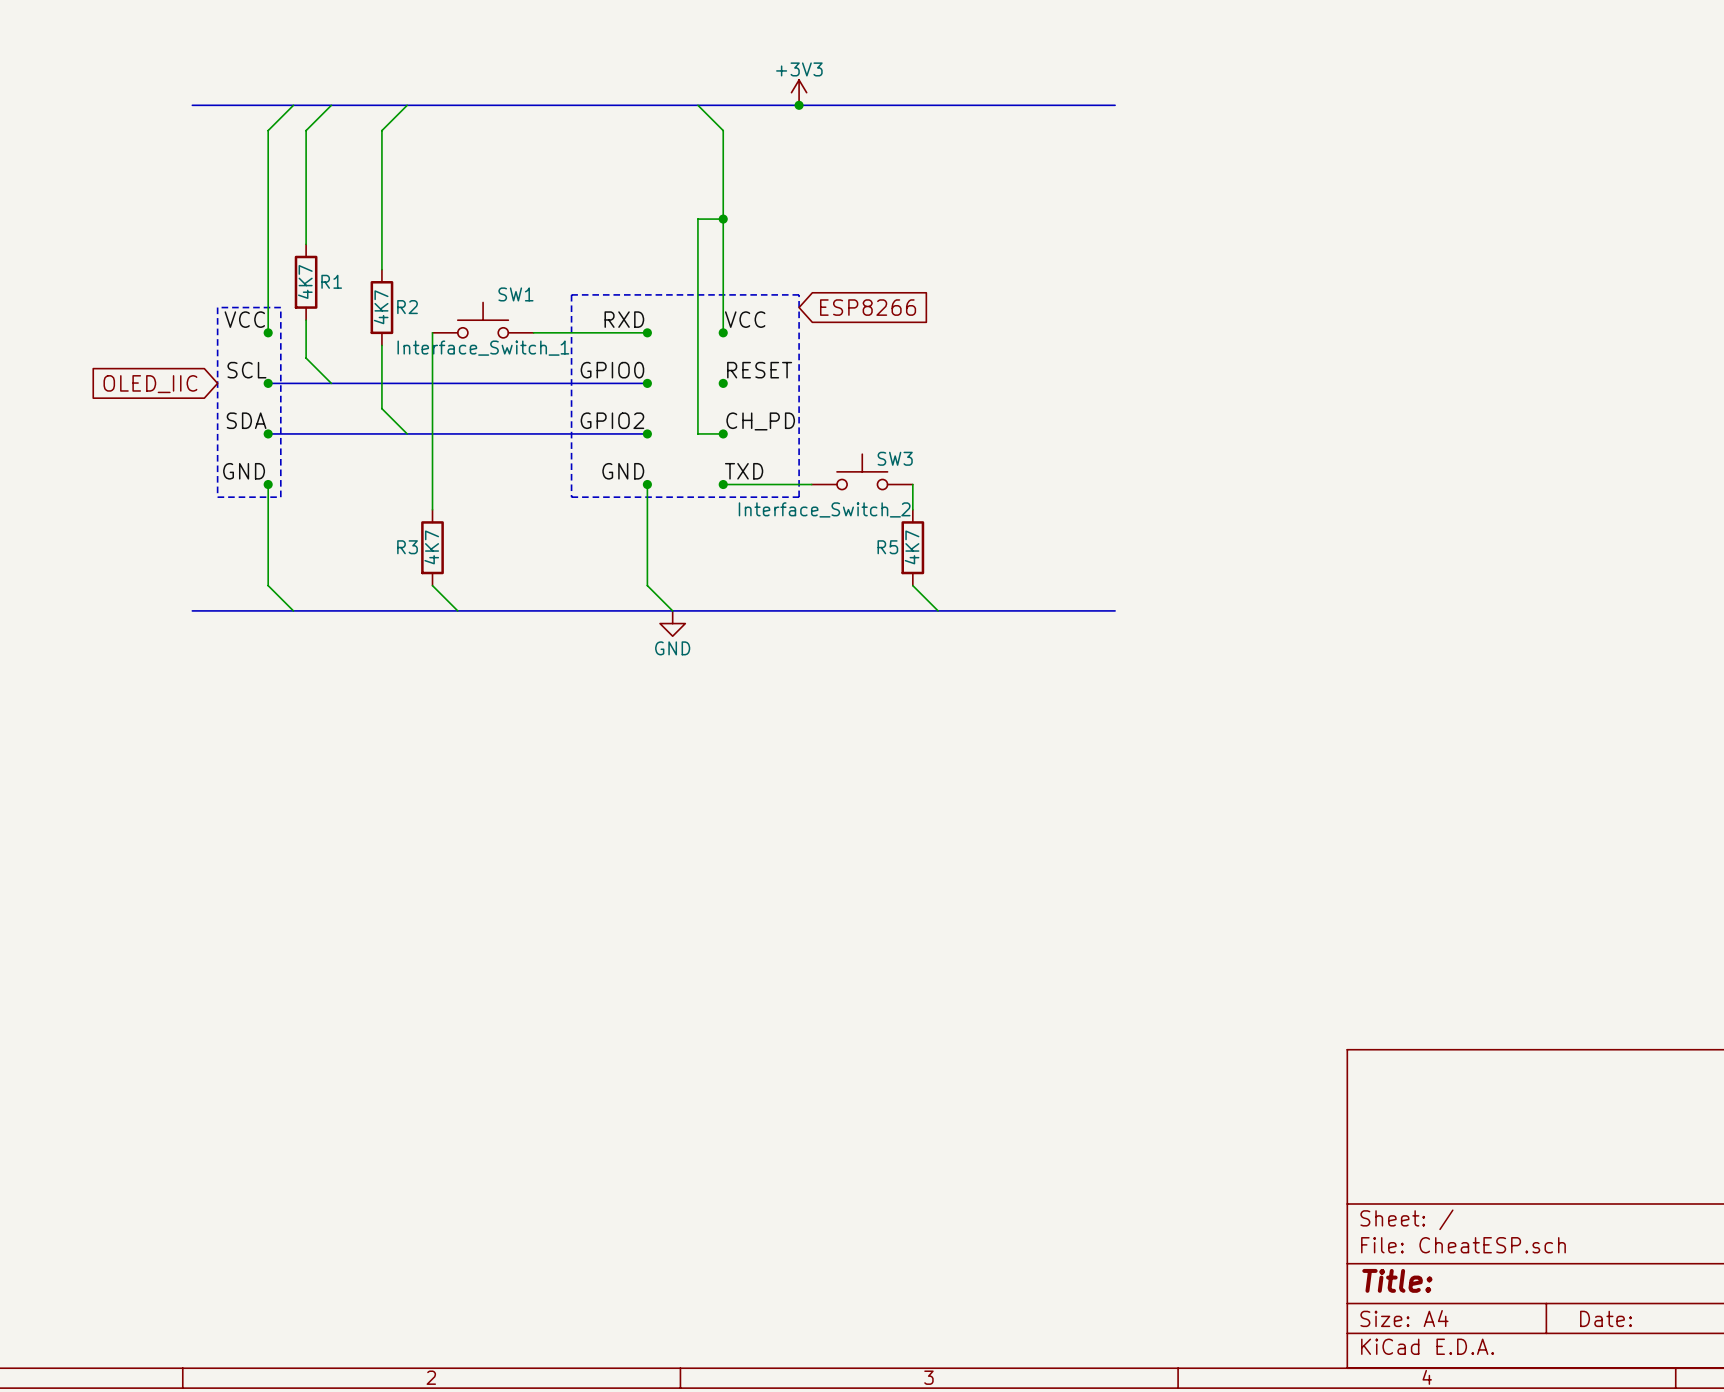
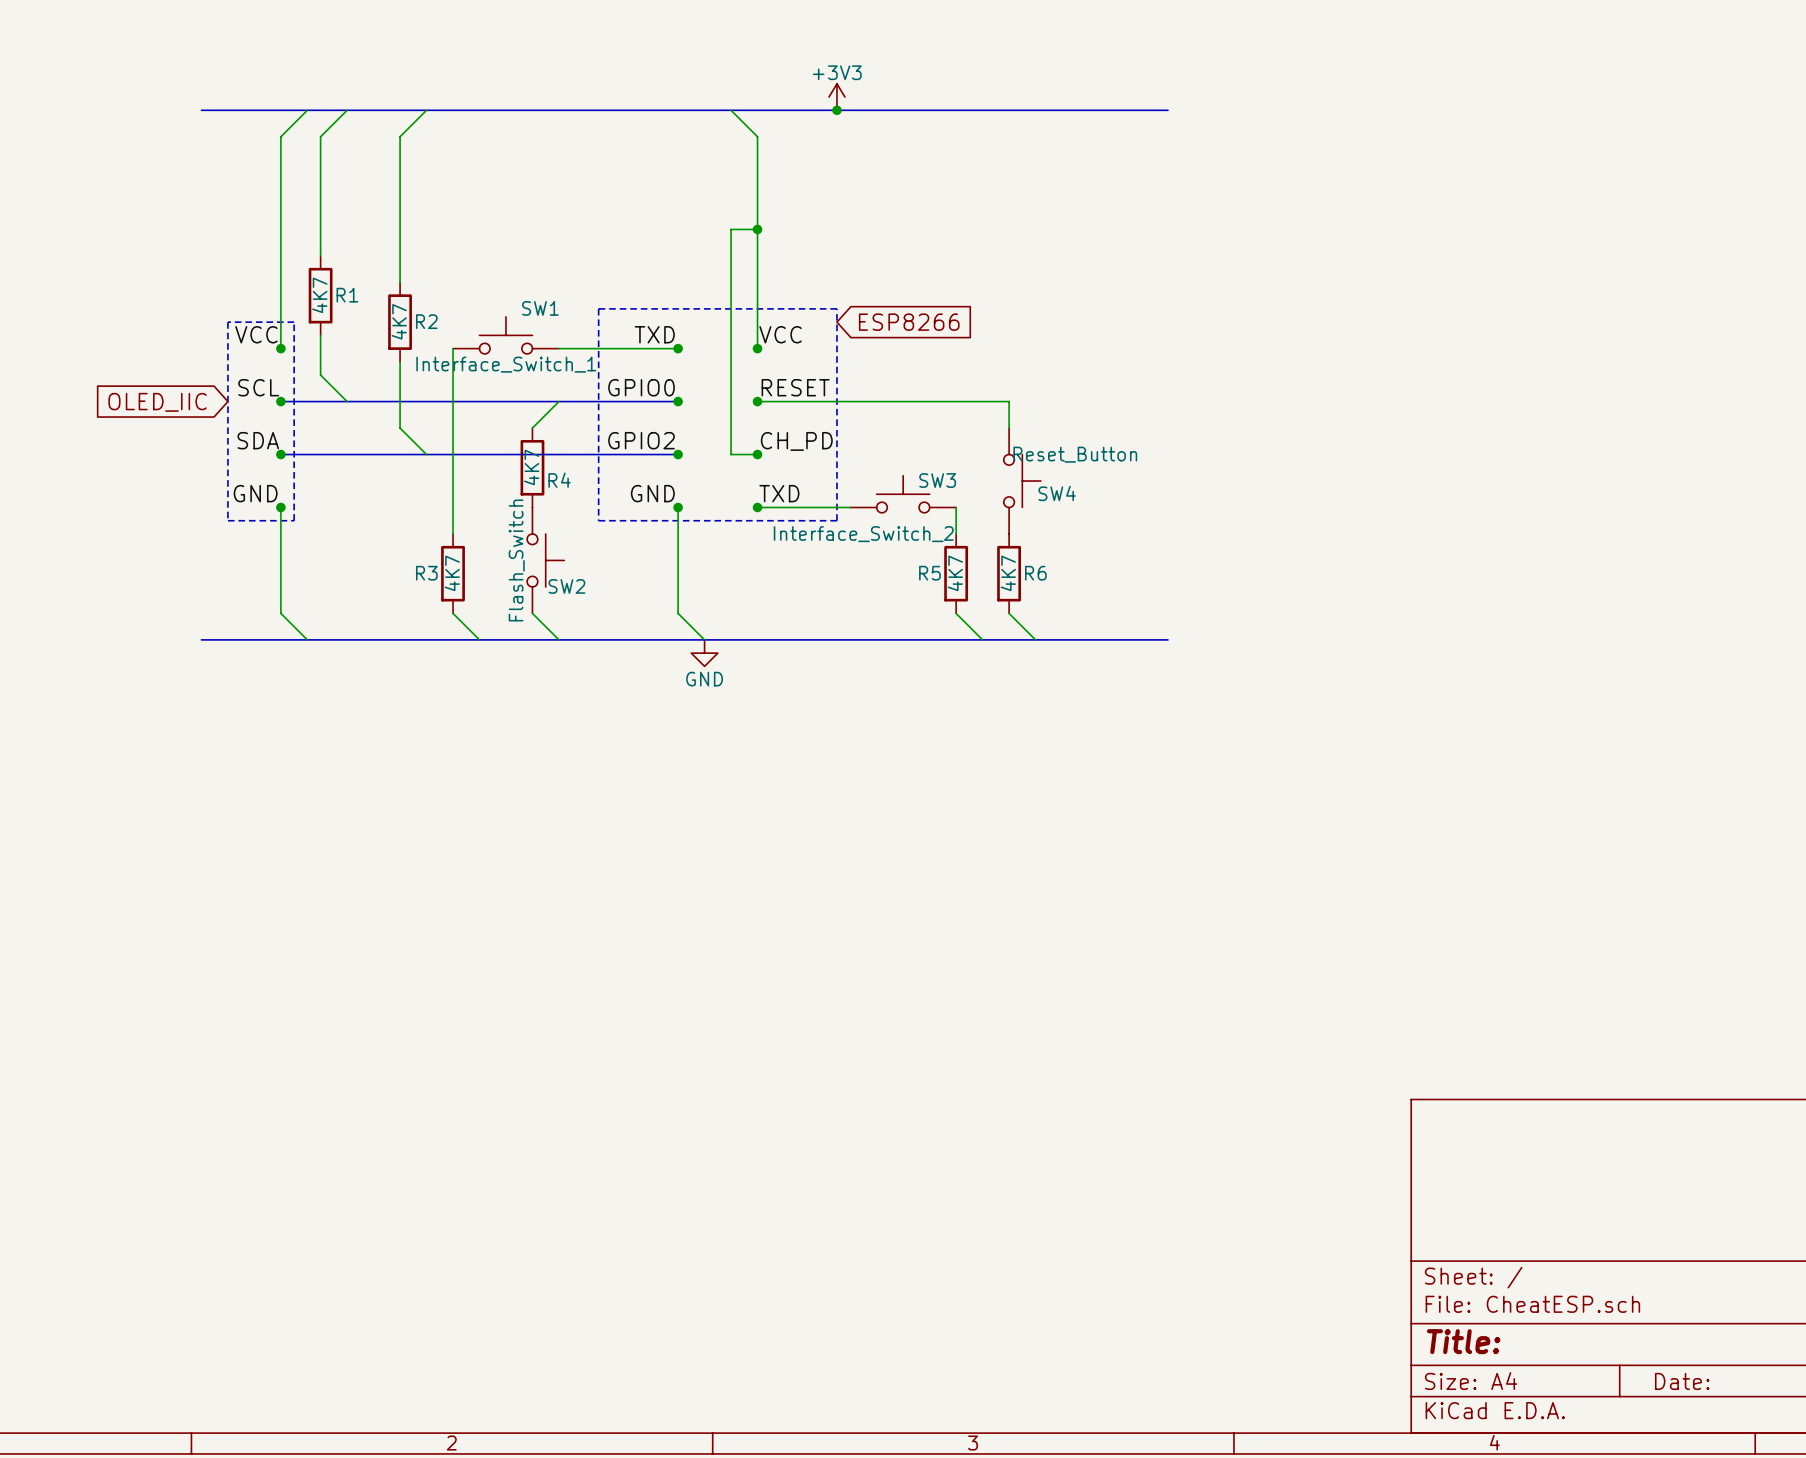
label: RXD (624, 319) -> TXD (654, 334)
wire: none -> (558, 401) (532, 428)
wire: none -> (757, 401) (1009, 401) (1009, 428)
R4: none -> 4K7 (532, 467)
SW4: none -> Reset_Button (1022, 481)
SW2: none -> Flash_Switch (545, 560)
R6: none -> 4K7 (1009, 573)
wire: none -> (532, 613) (558, 639)
wire: none -> (1009, 613) (1035, 639)

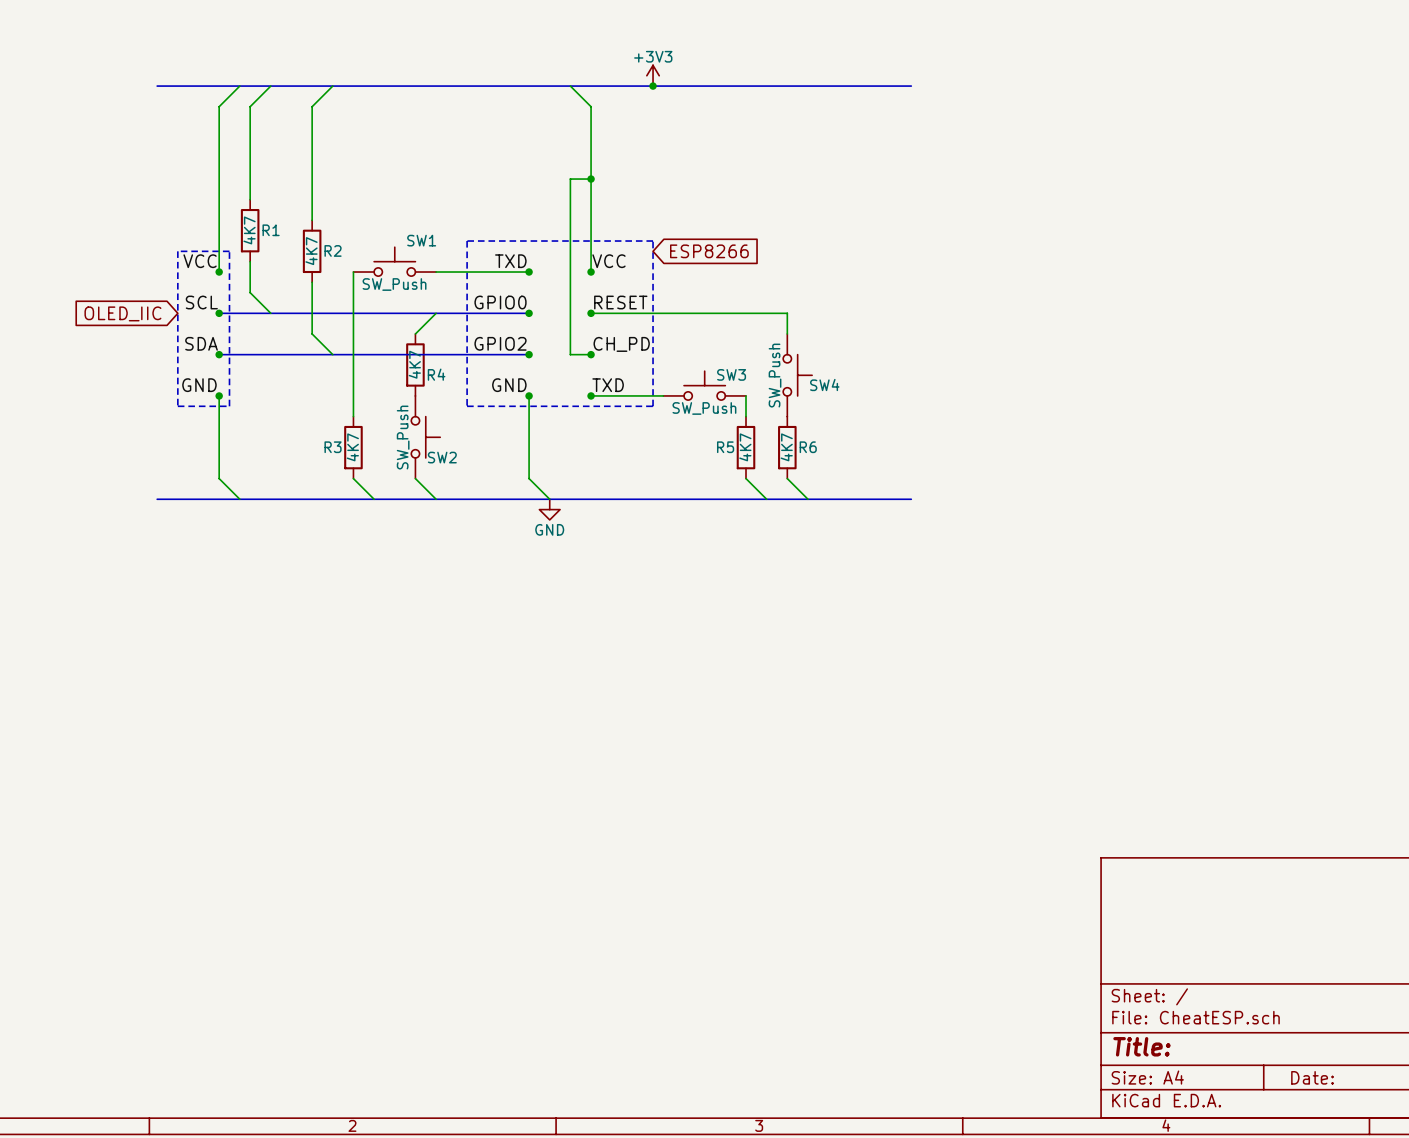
SW1 value: Interface_Switch_1 (506, 364) -> SW_Push (394, 284)
SW4 value: Reset_Button (1075, 454) -> SW_Push (775, 375)
SW3 value: Interface_Switch_2 (863, 534) -> SW_Push (704, 408)
SW2 value: Flash_Switch (516, 560) -> SW_Push (403, 437)

